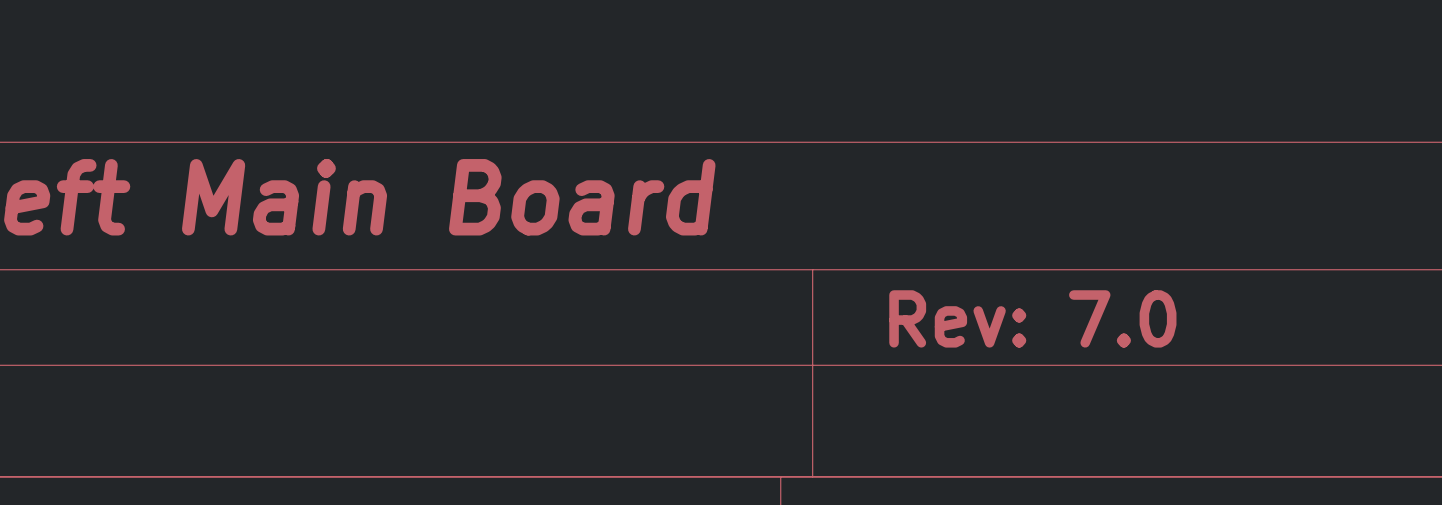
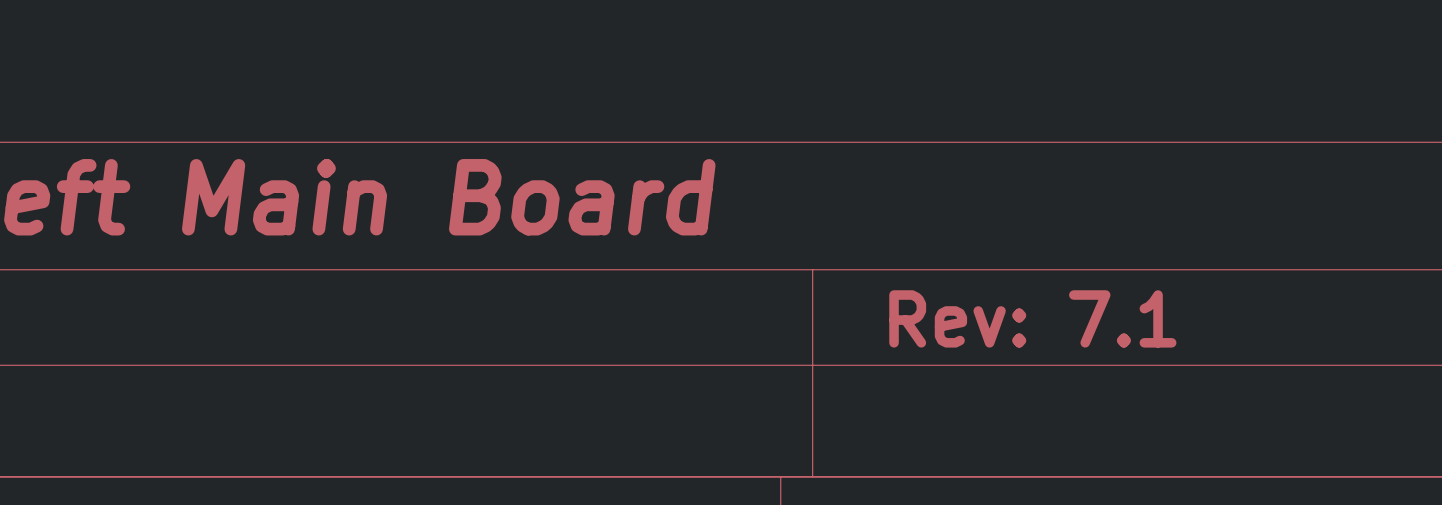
title block: Rev: 7.0 (1032, 318) -> Rev: 7.1 (1032, 318)

